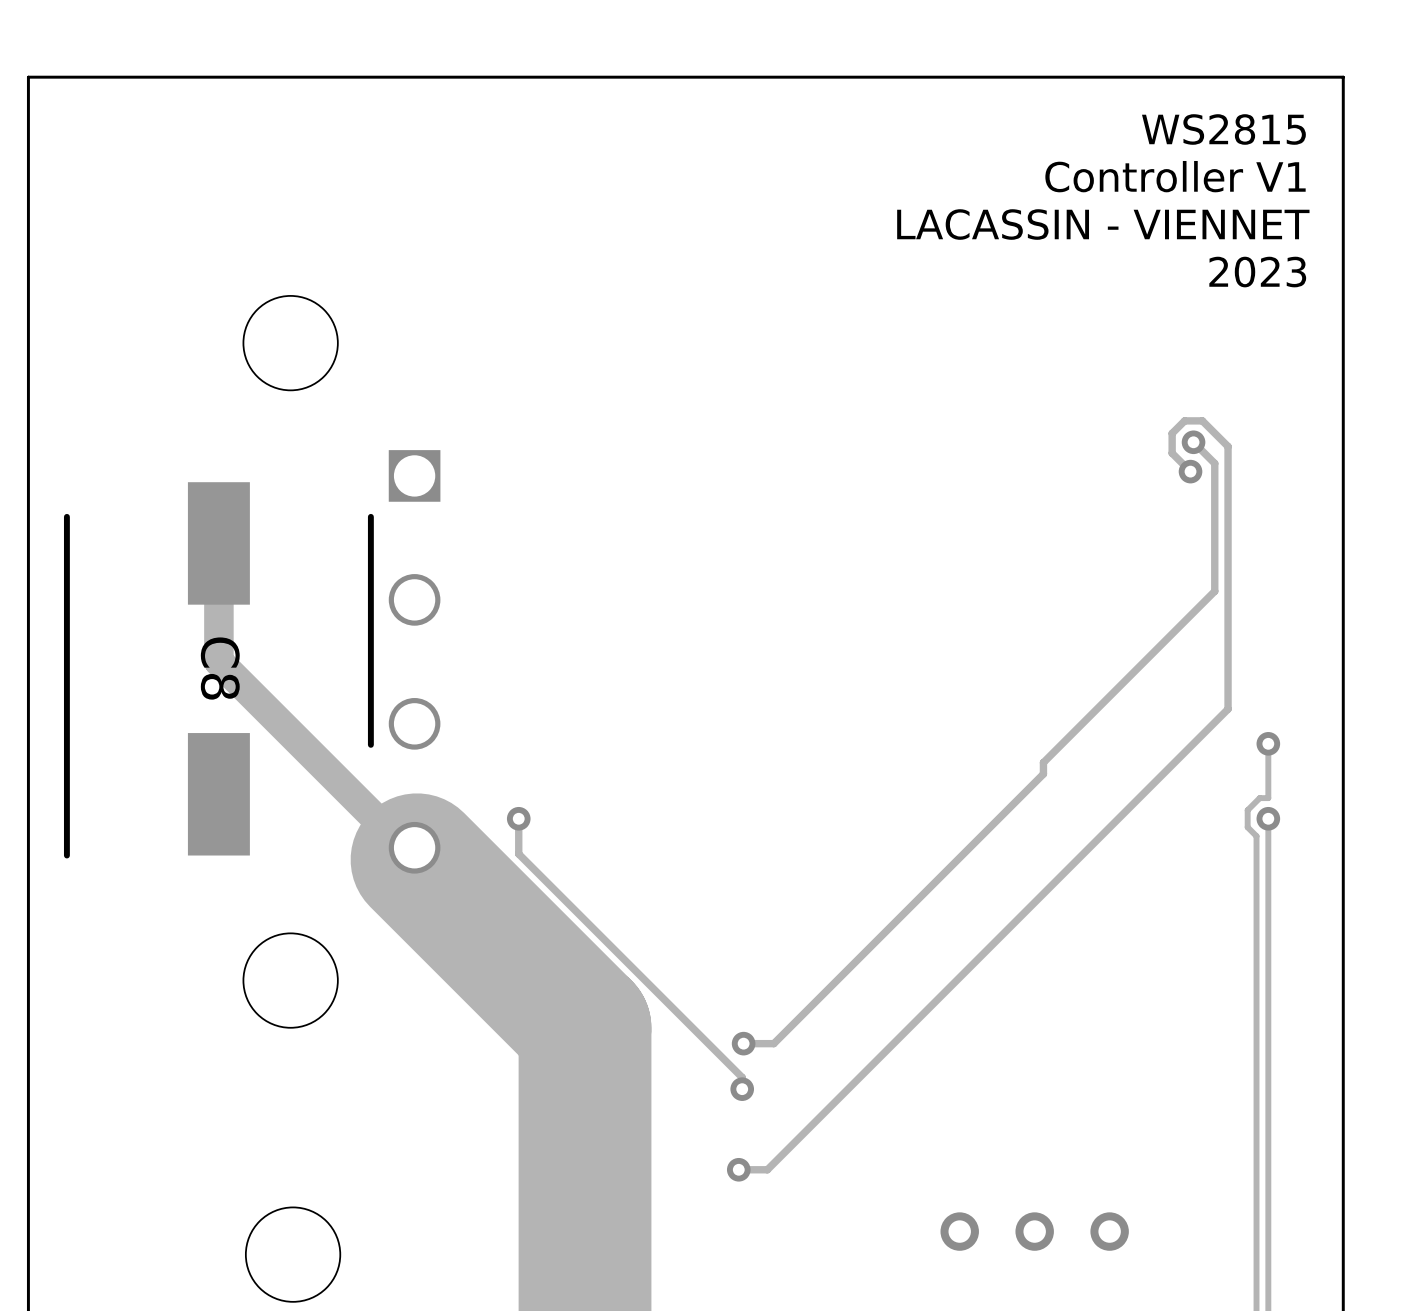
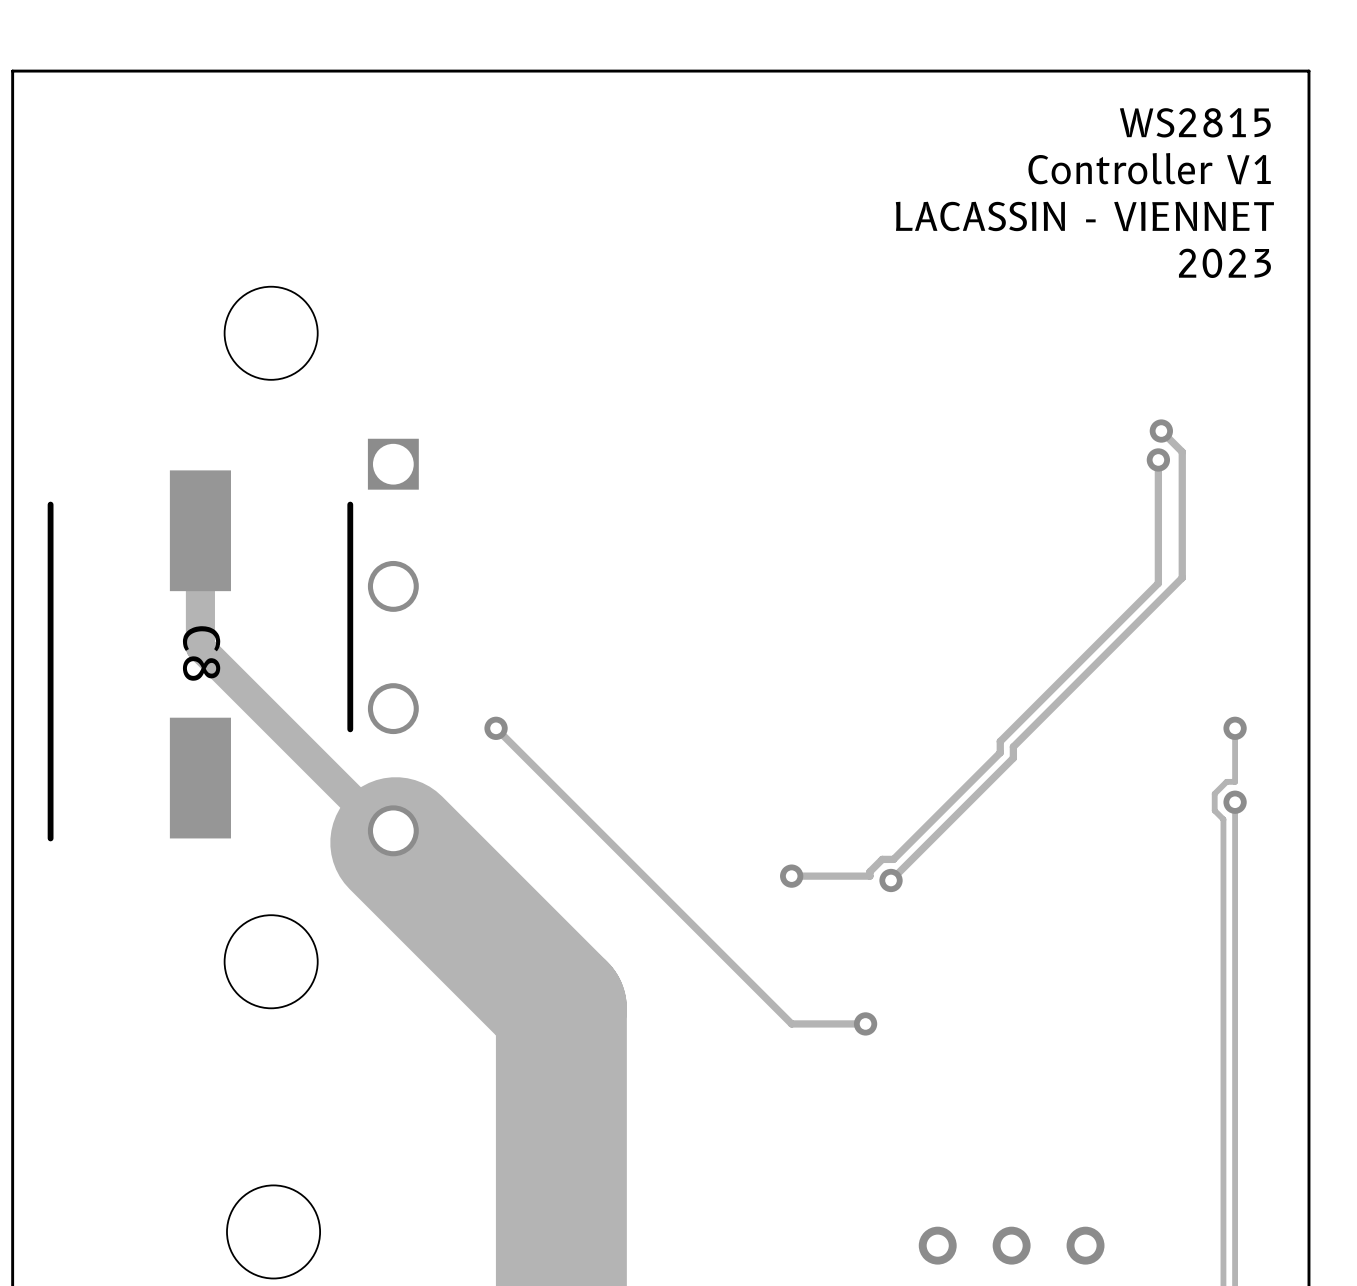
track: (1190, 471) (1172, 453) (1172, 433) (1184, 420) (1202, 420) (1228, 446) (1228, 709) (767, 1169) (738, 1169) -> (1158, 459) (1158, 583) (1000, 741) (1000, 752) (893, 859) (882, 859) (869, 871) (869, 876) (791, 876)
track: none -> (496, 728) (791, 1023) (865, 1023)
track: (518, 818) (518, 854) (742, 1077) (742, 1089) -> none
via position: (518, 818) -> (496, 728)
via: none -> (791, 876)
track: (919, 898) (773, 1043) (743, 1043) -> none
via: none -> (891, 880)
via: (743, 1043) -> none
via: none -> (865, 1023)
via: (742, 1089) -> none
via: (738, 1169) -> none
part position: (1034, 1231) -> (1011, 1245)

